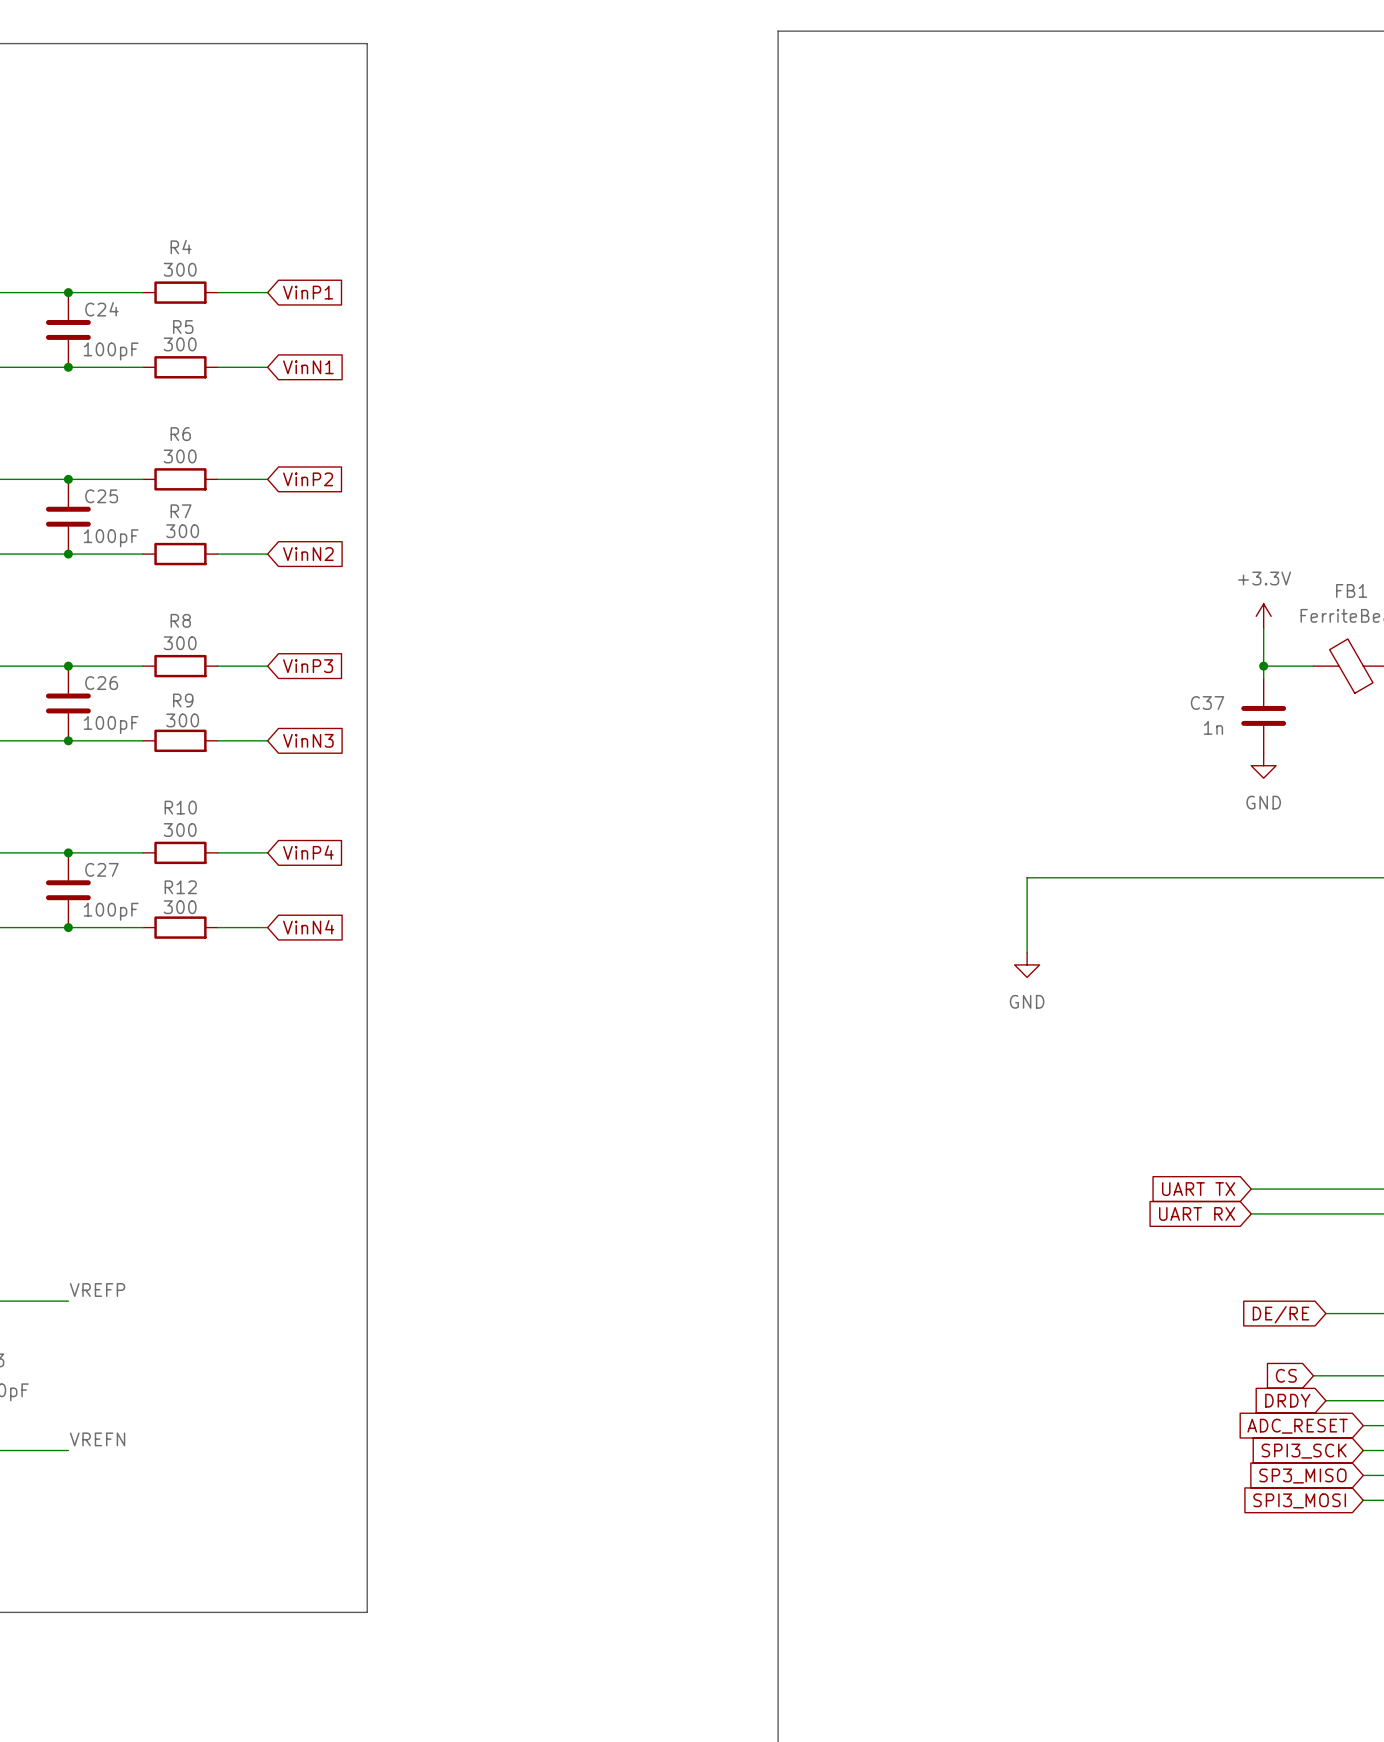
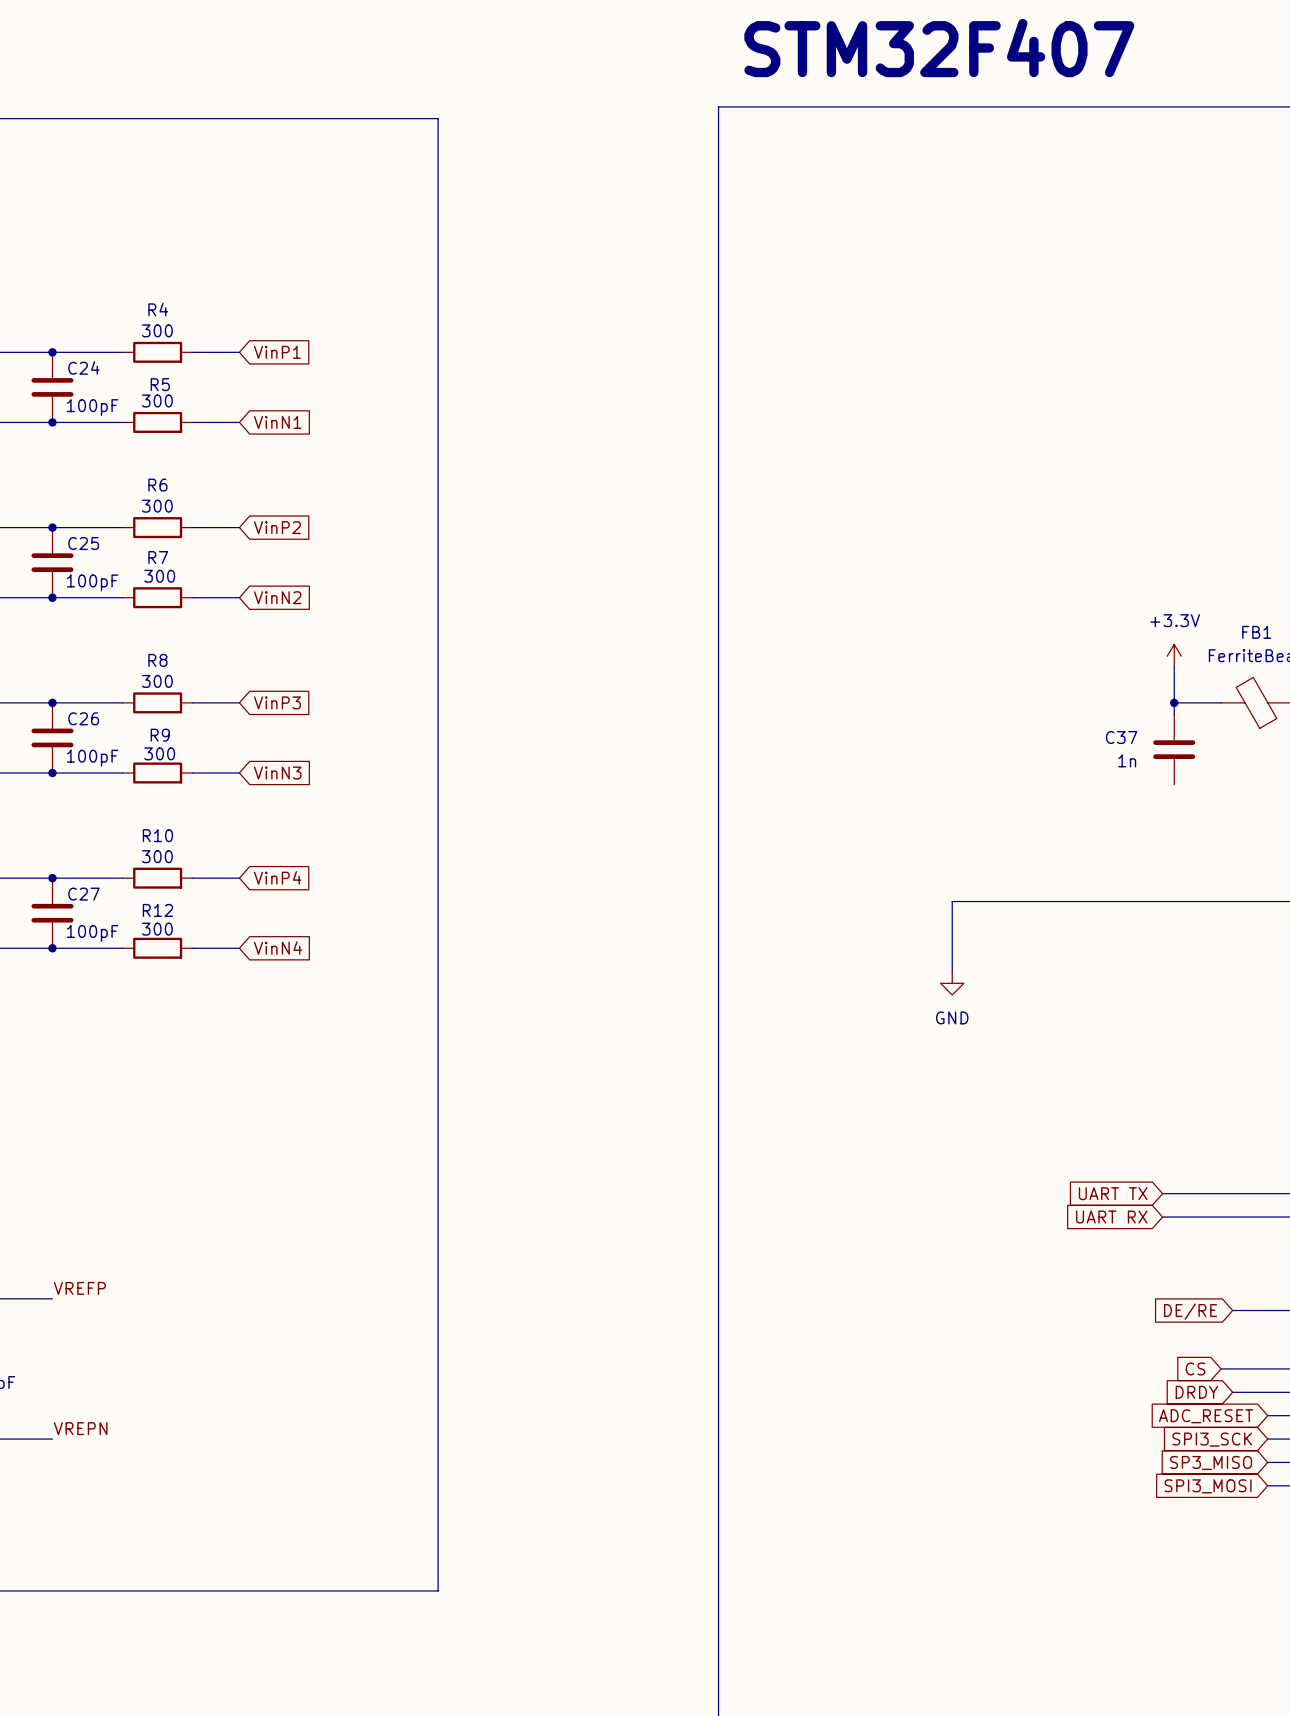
line: (367, 43) (367, 1612) -> (332, 118) (438, 118) (438, 1590) (332, 1590)
power symbol: GND (1263, 765) -> none
label: VREFN (97, 1439) -> VREPN (80, 1428)

